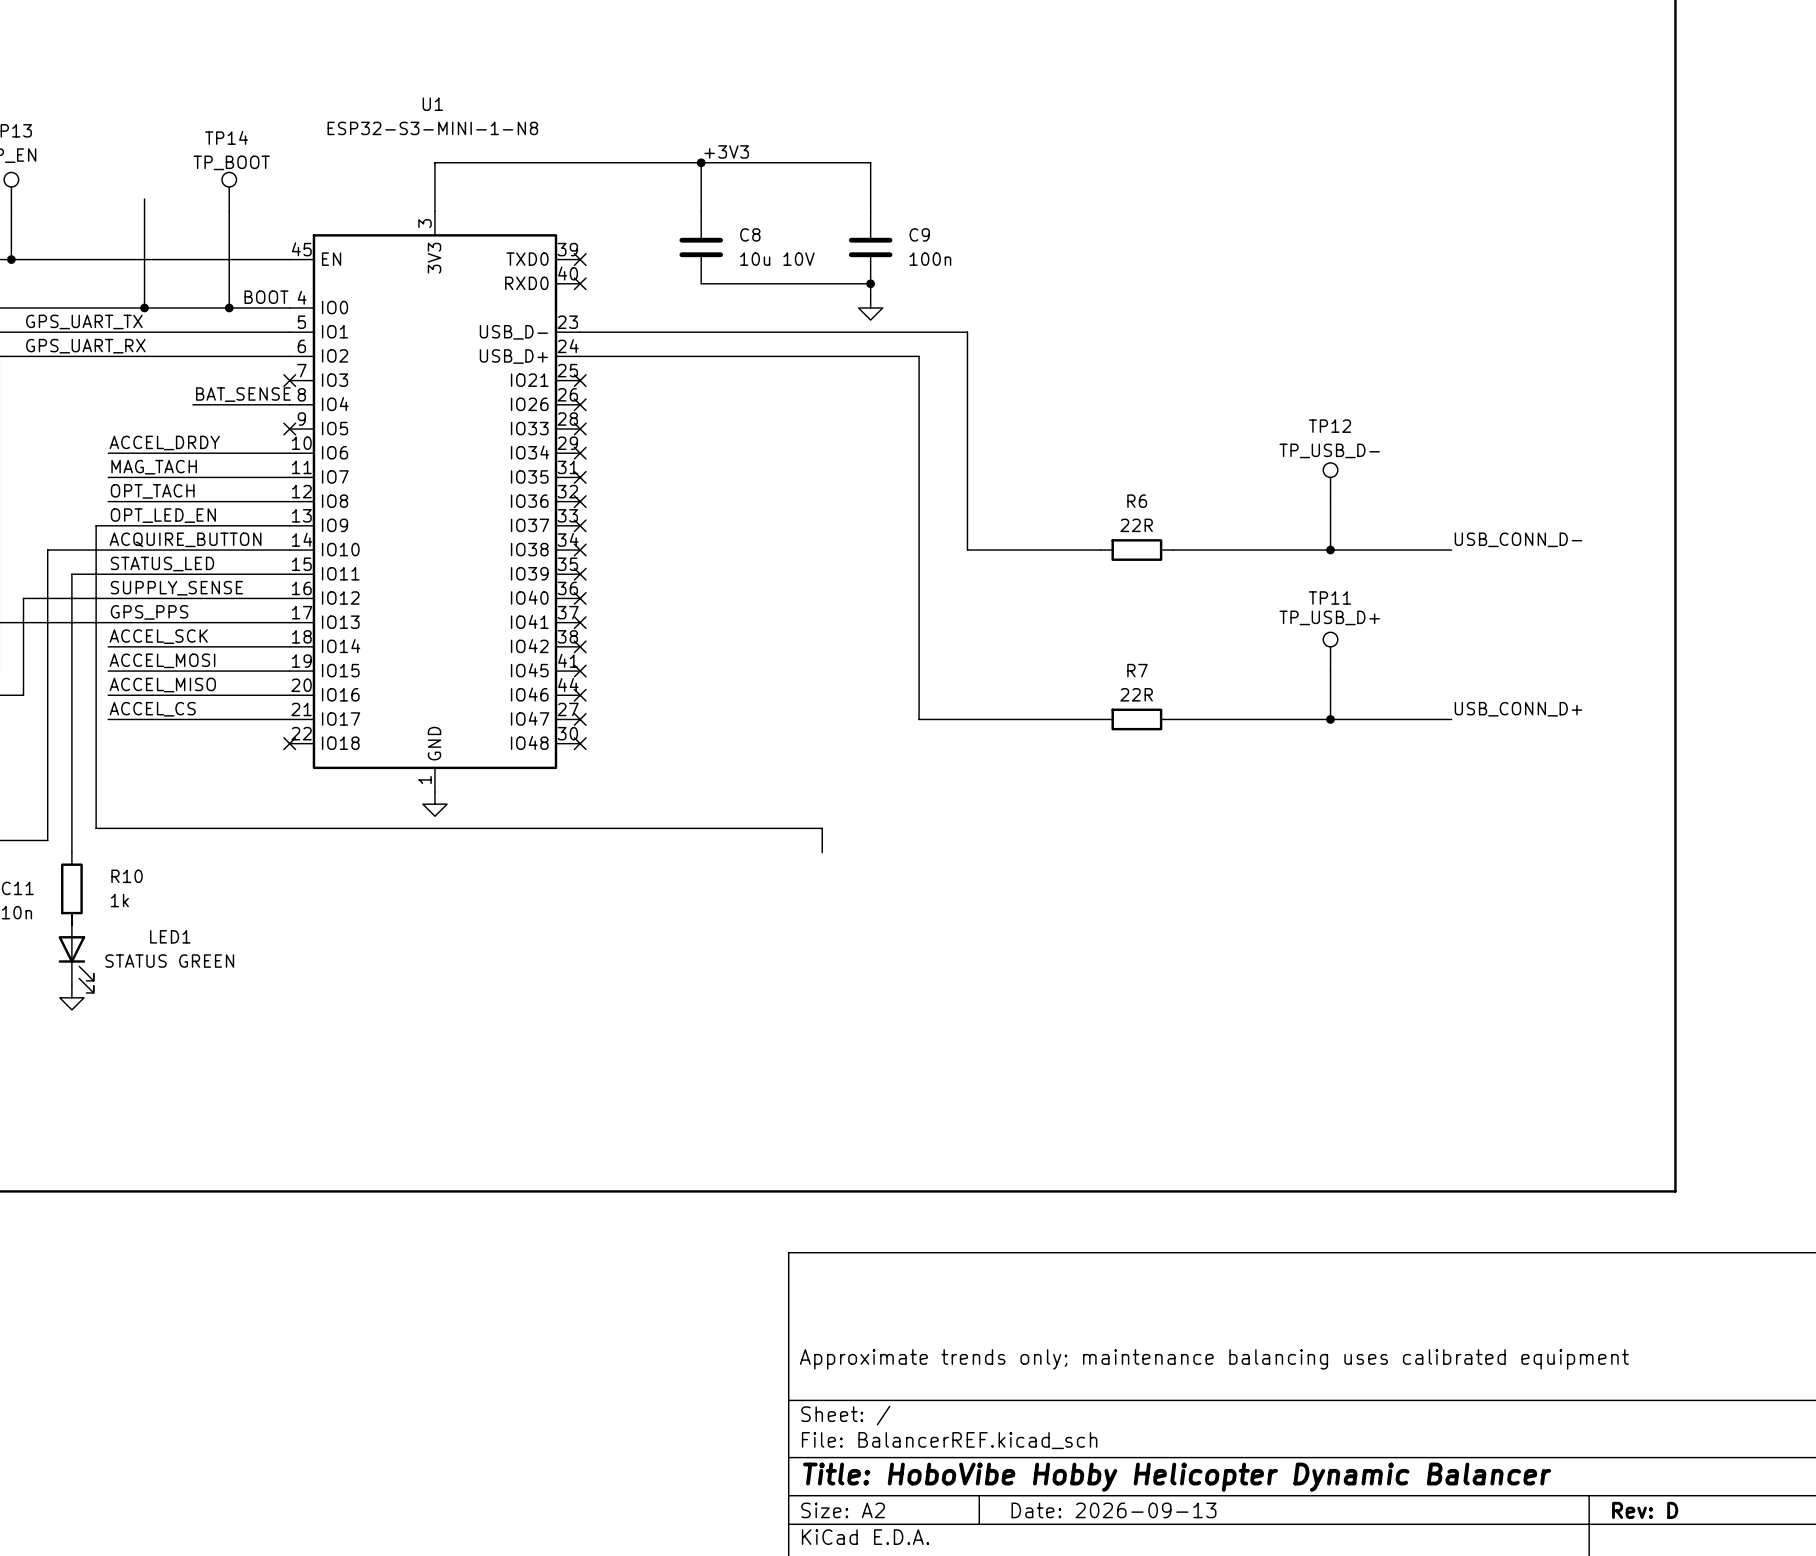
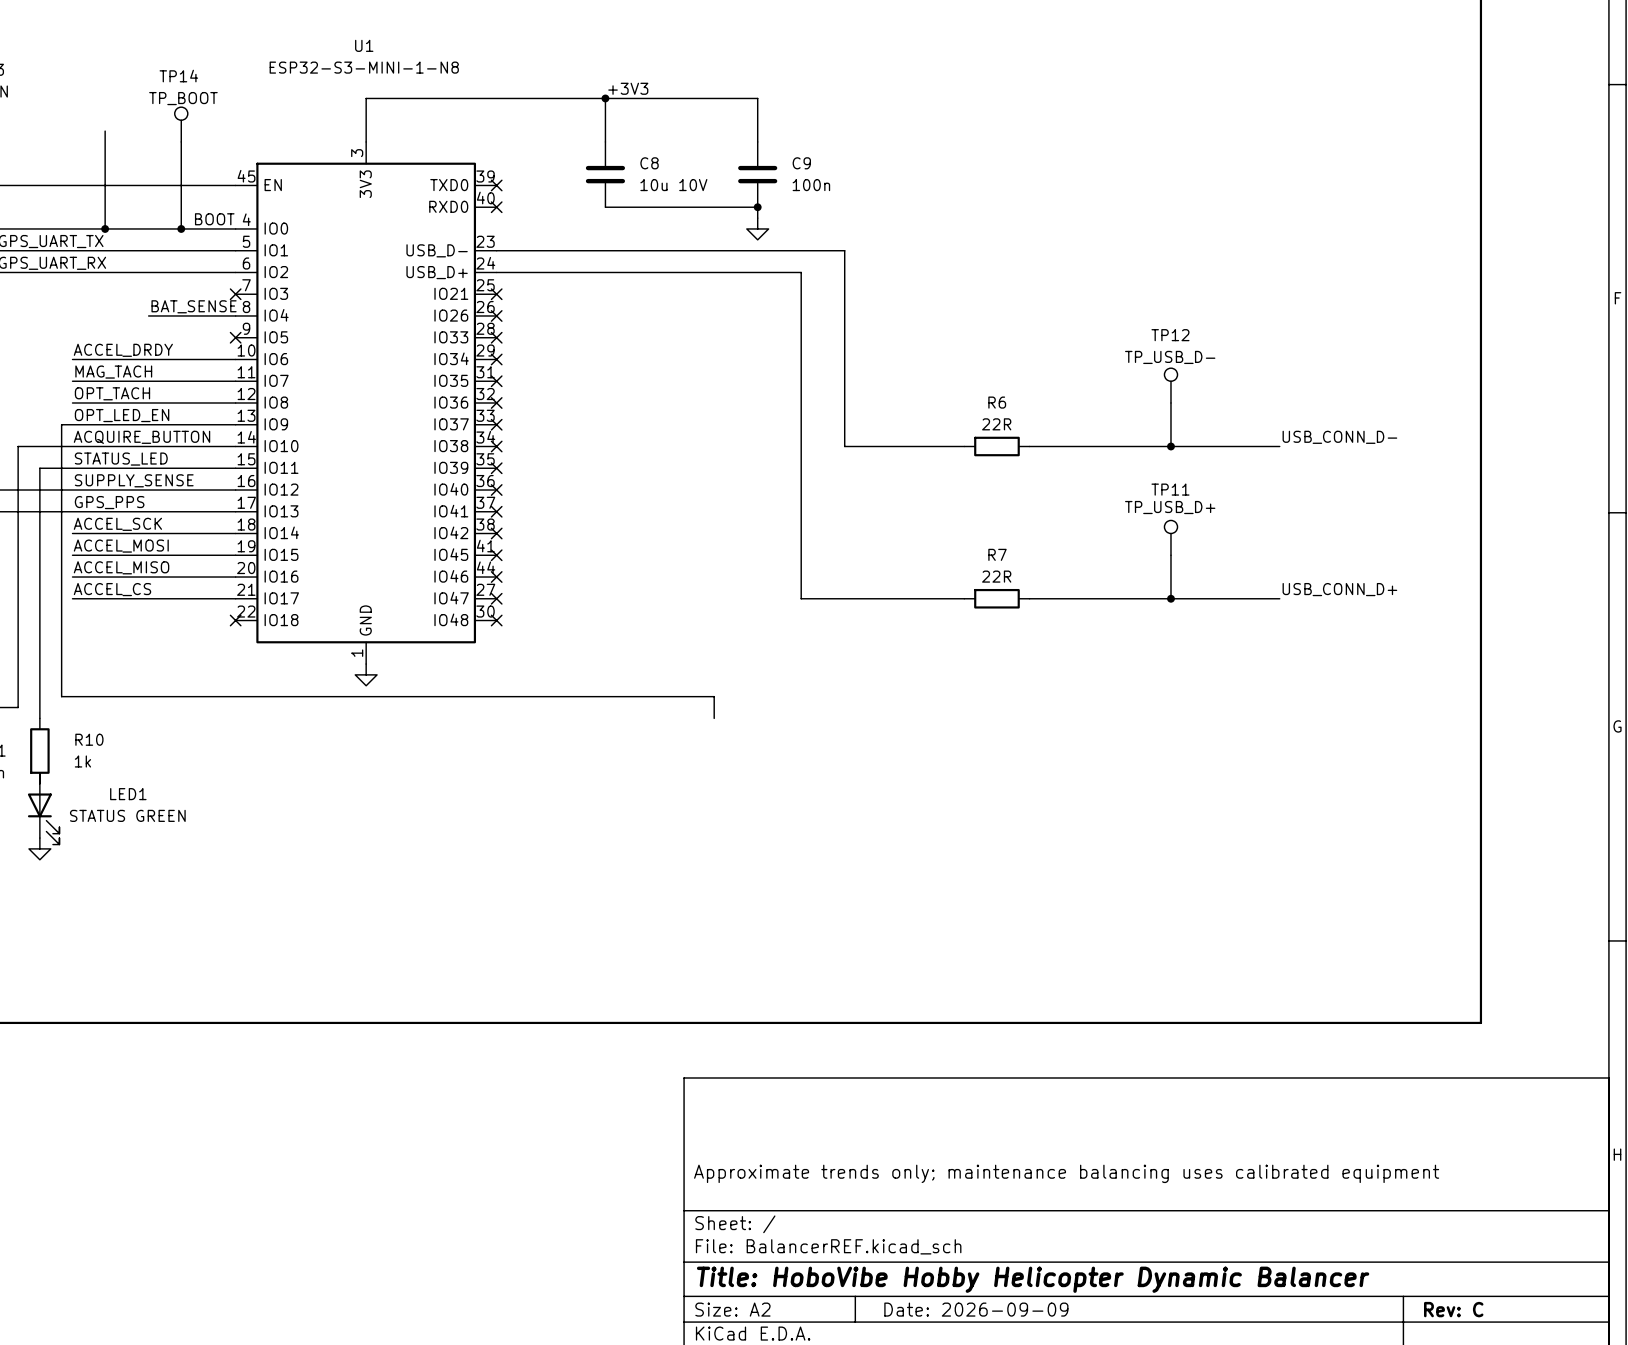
title block: Date: 2026-09-13 (1113, 1510) -> Date: 2026-09-09 (976, 1309)
title block: Rev: D (1645, 1510) -> Rev: C (1453, 1309)

